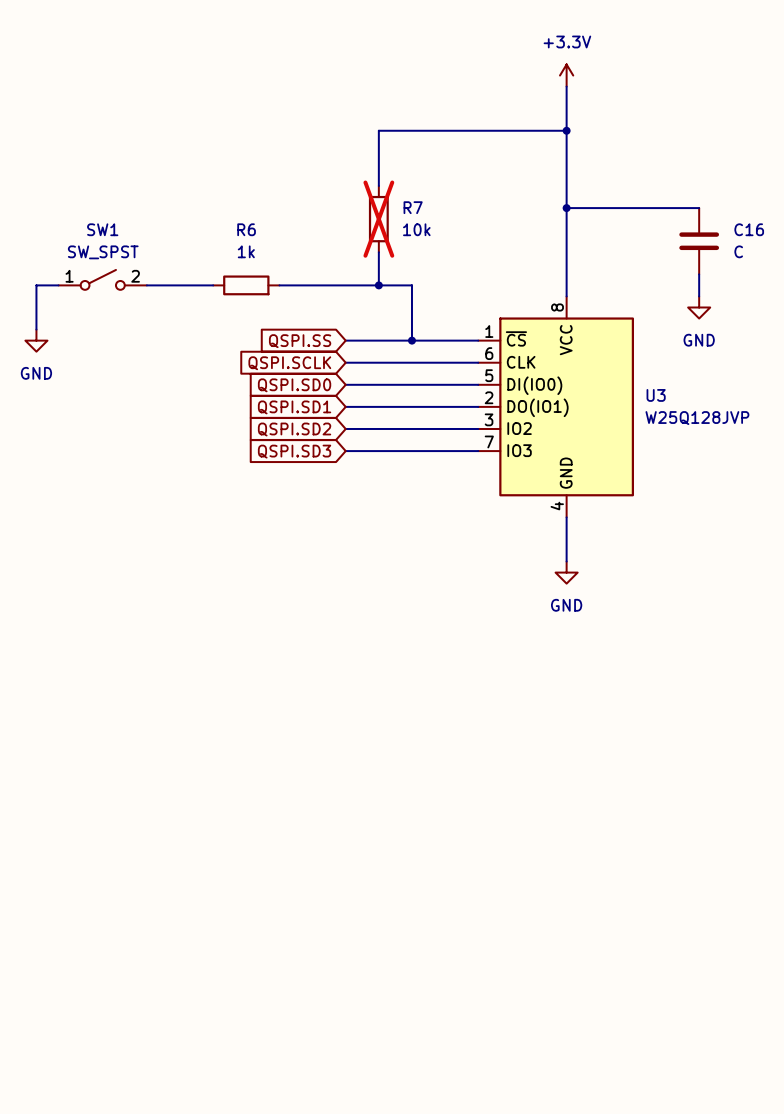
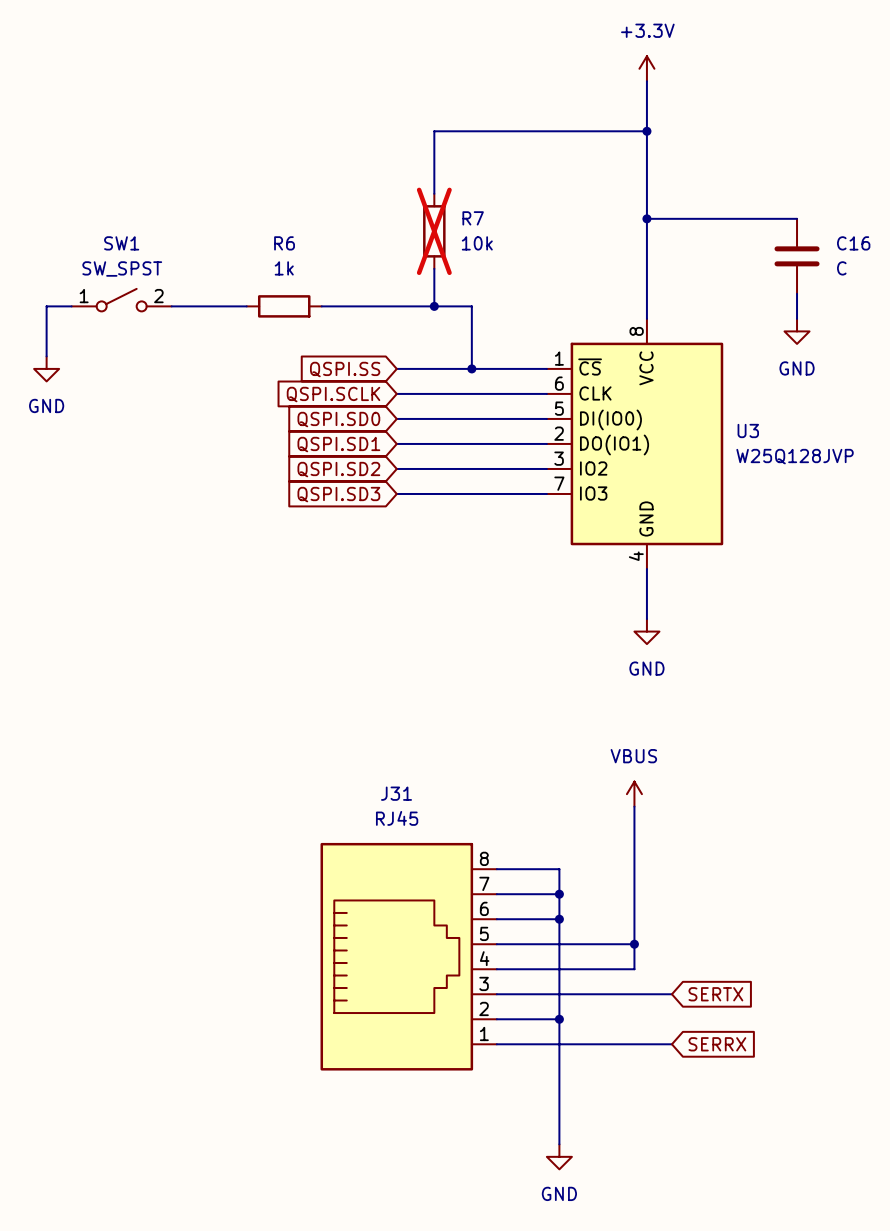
power symbol: none -> VBUS (634, 794)
wire: none -> (634, 806) (634, 969) (496, 969)
wire: none -> (496, 869) (559, 869) (559, 1144)
wire: none -> (496, 894) (559, 894)
junction: none -> (559, 894)
wire: none -> (496, 919) (559, 919)
junction: none -> (559, 919)
wire: none -> (496, 944) (634, 944)
junction: none -> (634, 944)
J31: none -> RJ45 (408, 956)
wire: none -> (496, 994) (671, 994)
global label: none -> SERTX (715, 994)
wire: none -> (496, 1019) (559, 1019)
junction: none -> (559, 1019)
wire: none -> (496, 1044) (671, 1044)
global label: none -> SERRX (717, 1044)
power symbol: none -> GND (559, 1156)

